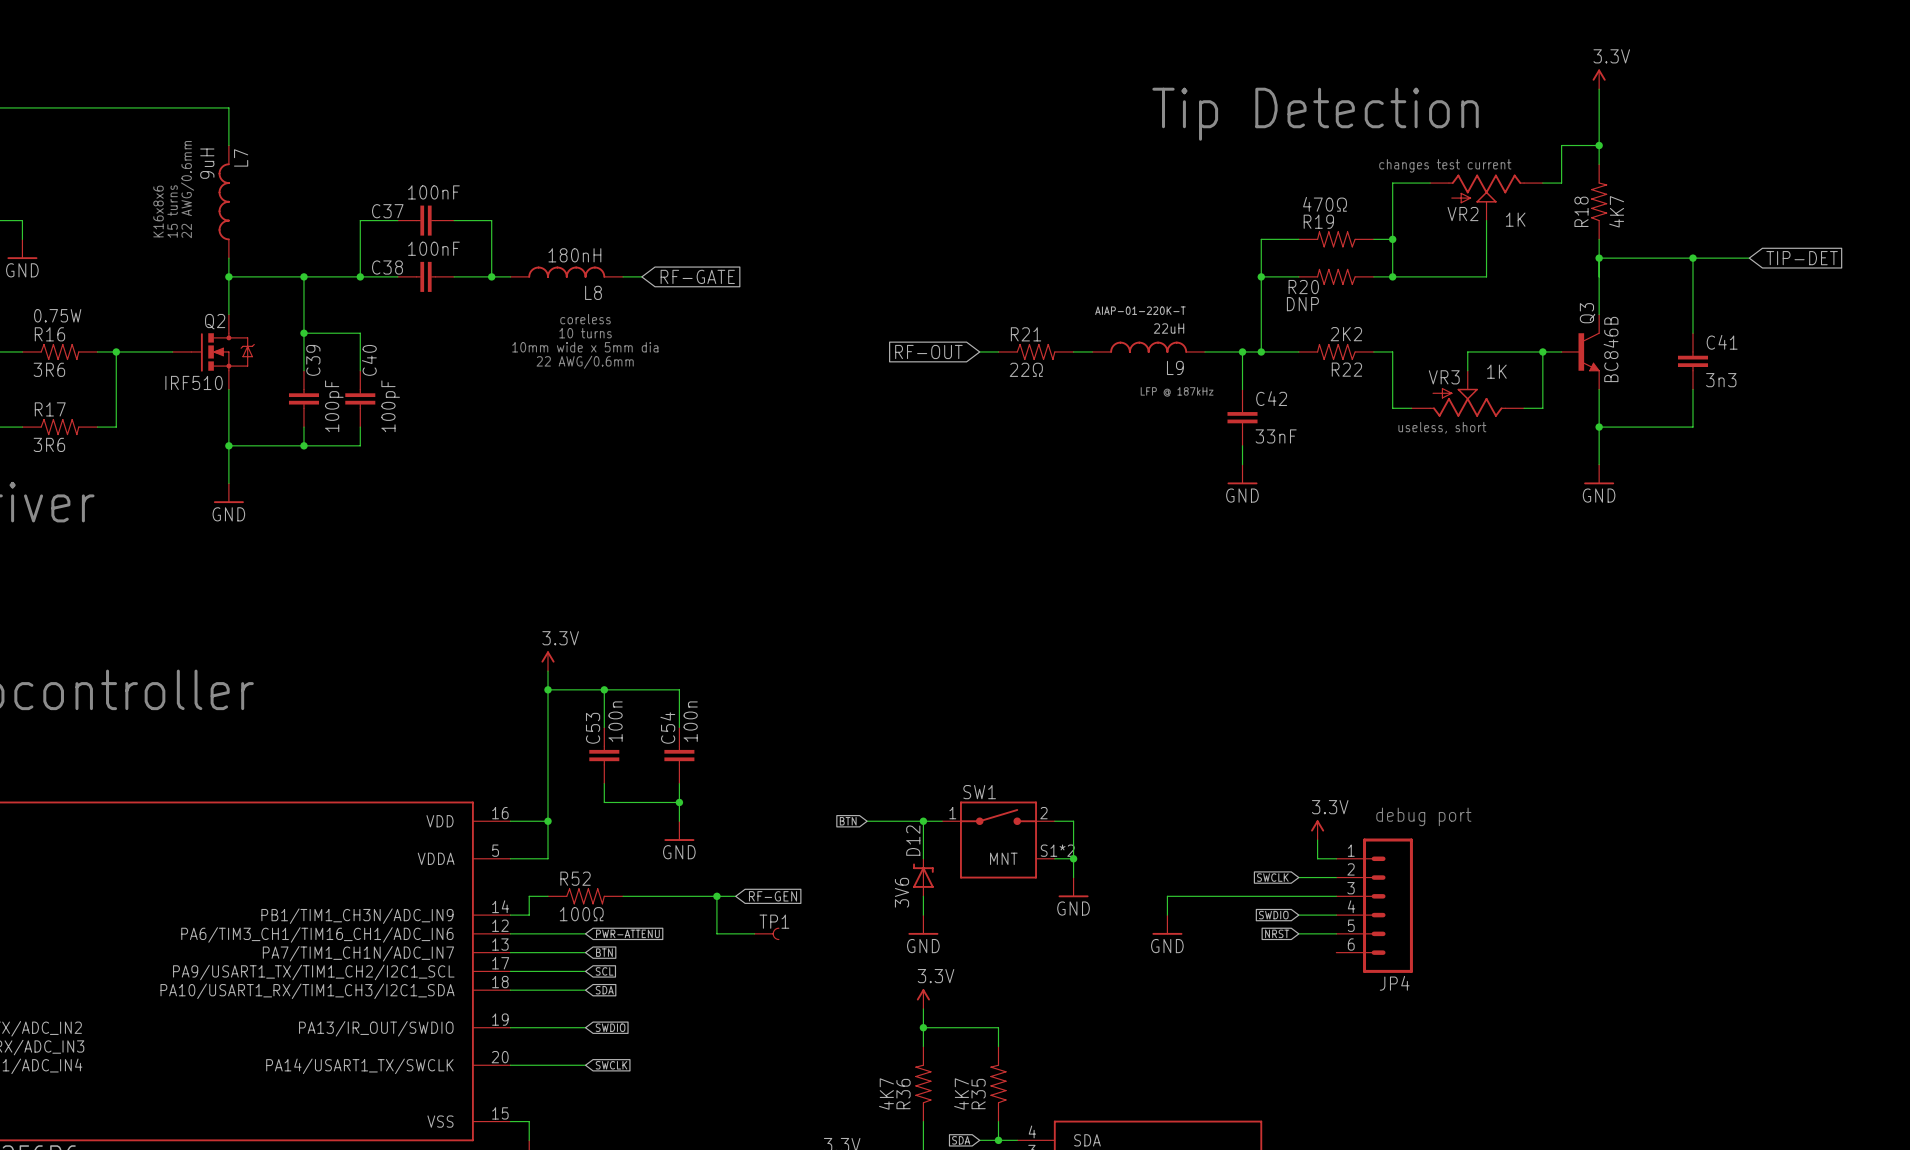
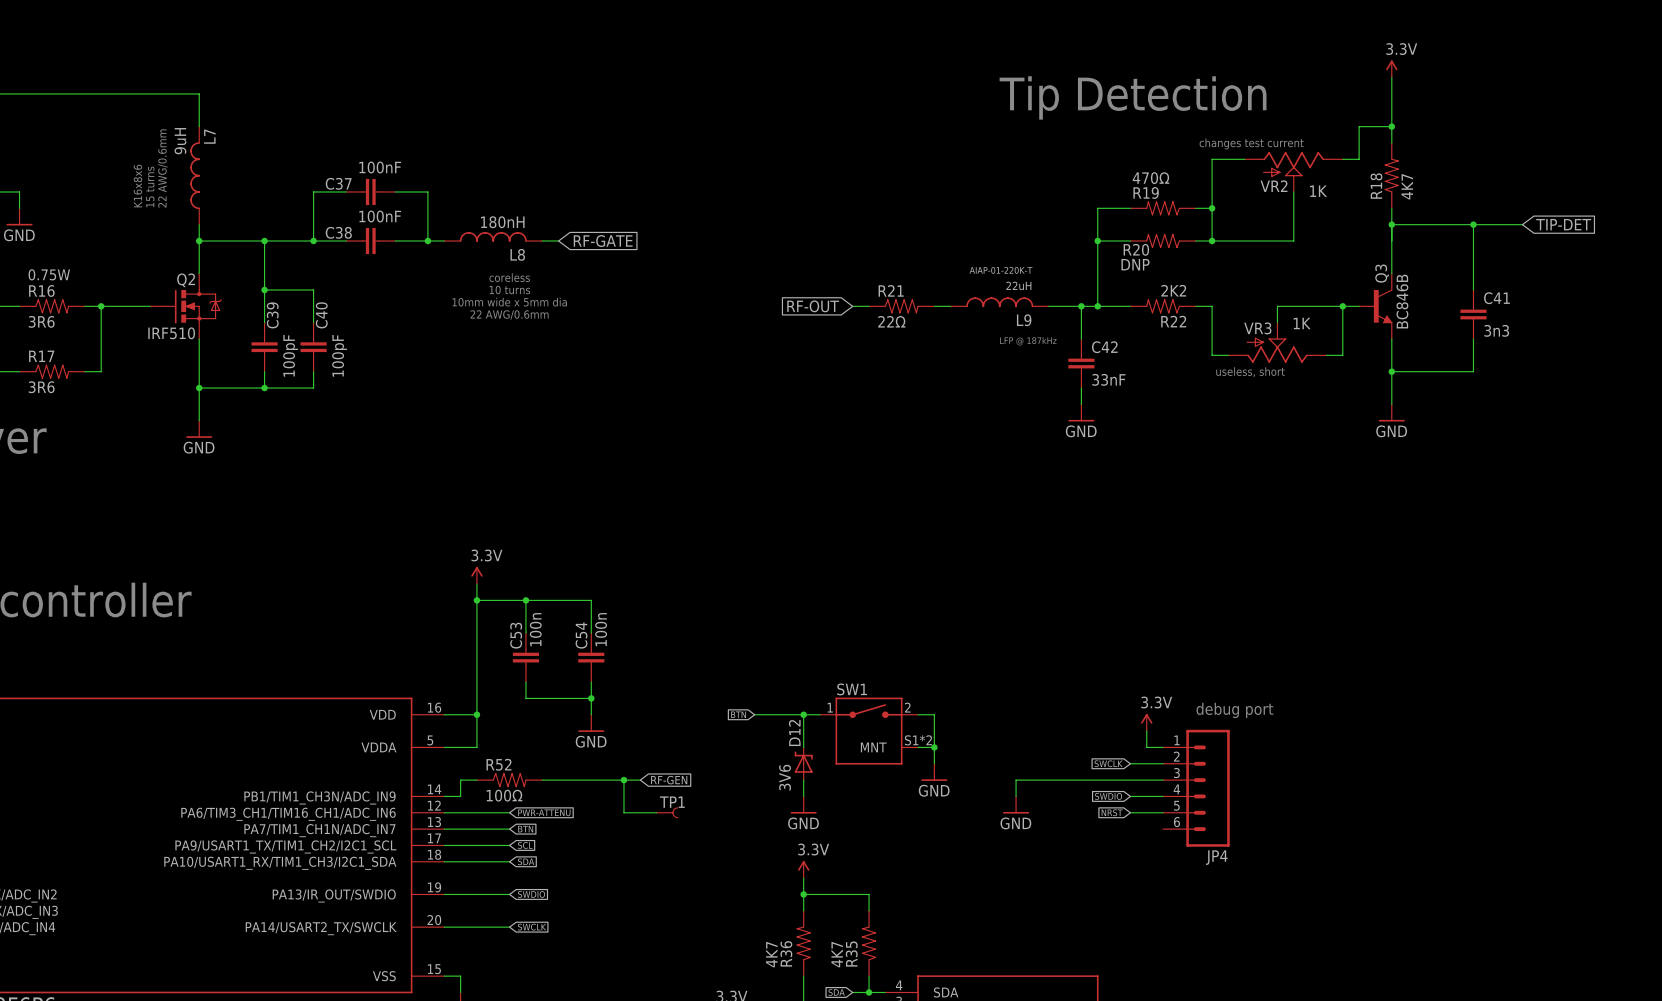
part pin name: PA14/USART1_TX/SWCLK (359, 1066) -> PA14/USART2_TX/SWCLK (321, 928)

